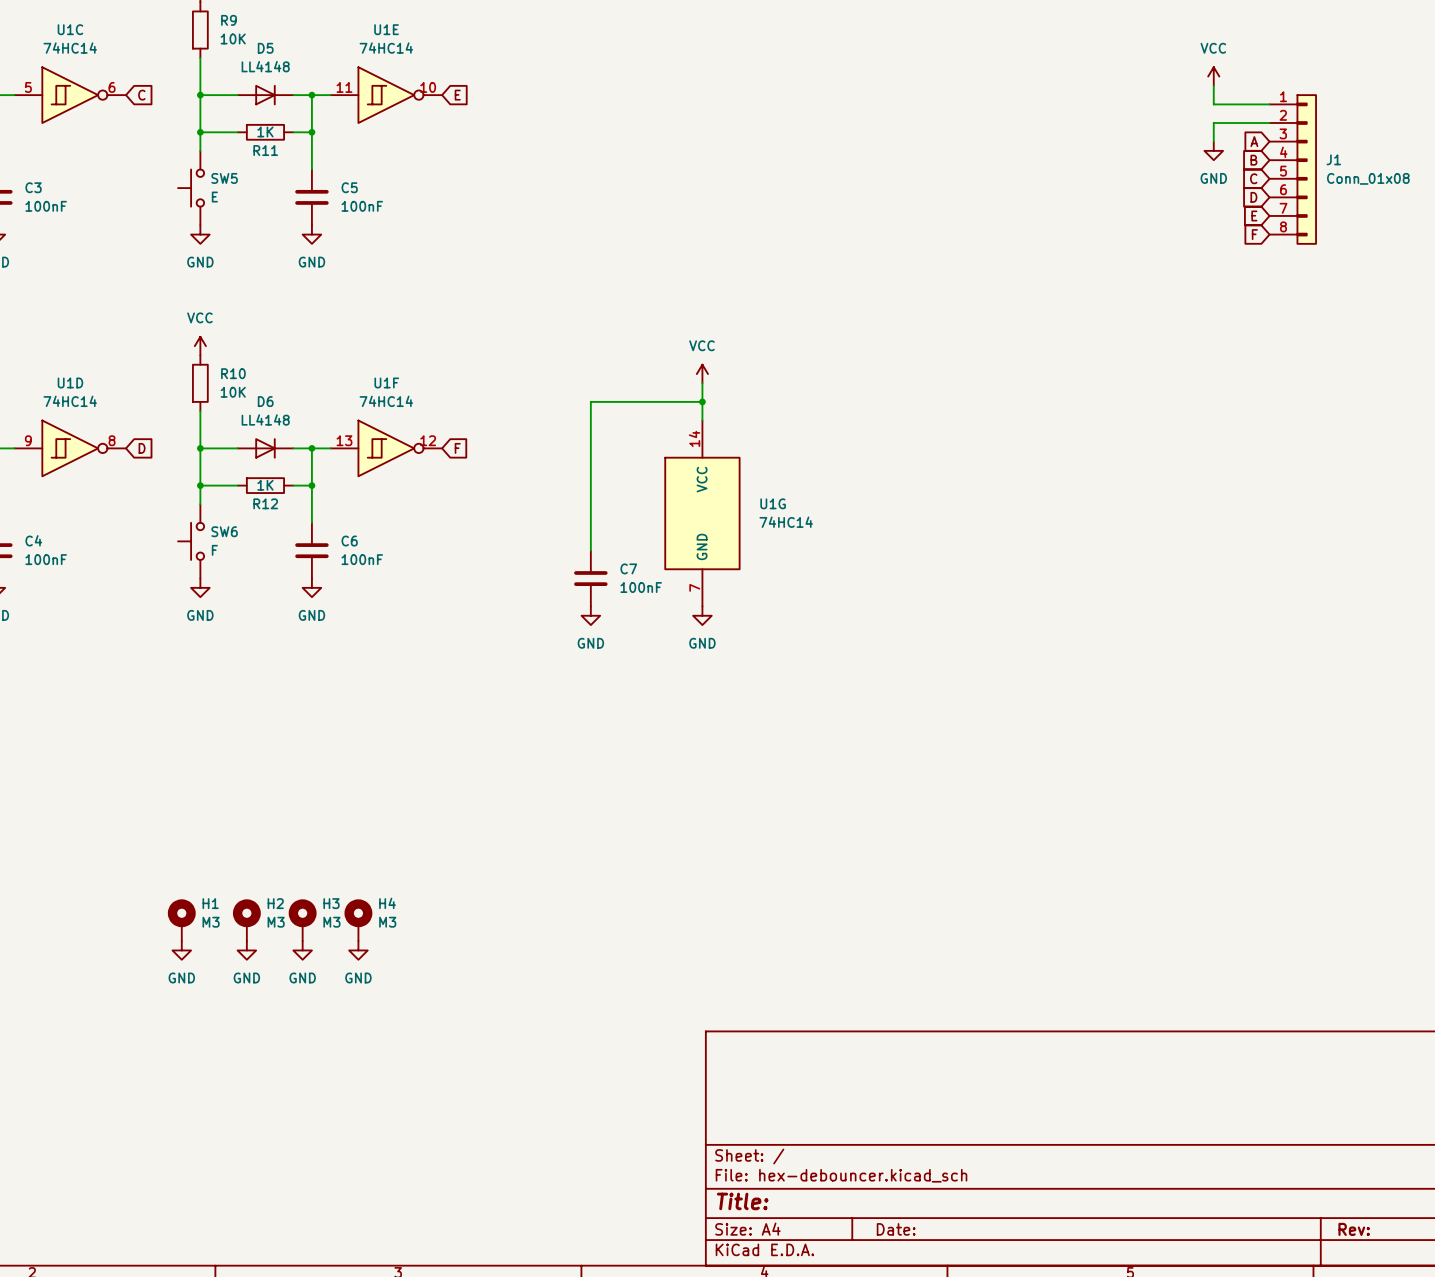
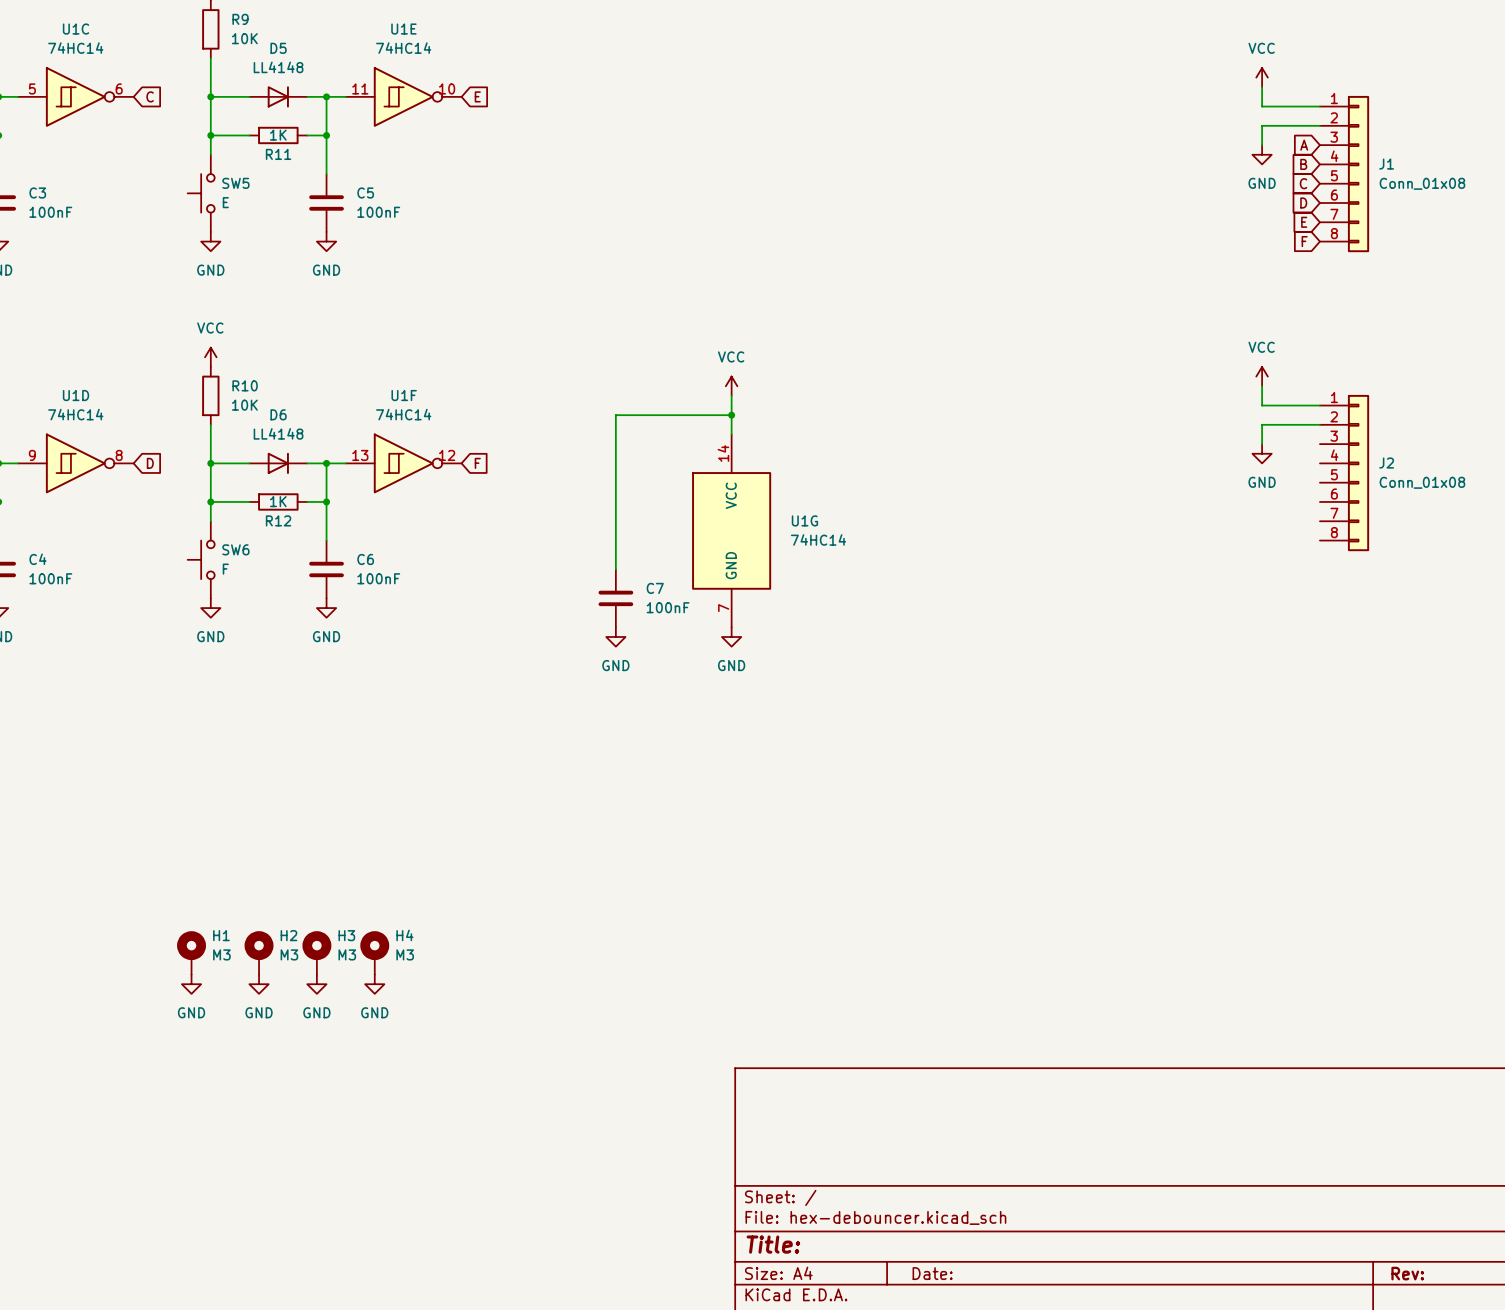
power symbol: none -> VCC (1262, 376)
wire: none -> (1262, 386) (1262, 405) (1319, 405)
wire: none -> (1319, 424) (1262, 424) (1262, 444)
power symbol: none -> GND (1262, 453)
J2: none -> Conn_01x08 (1344, 473)

